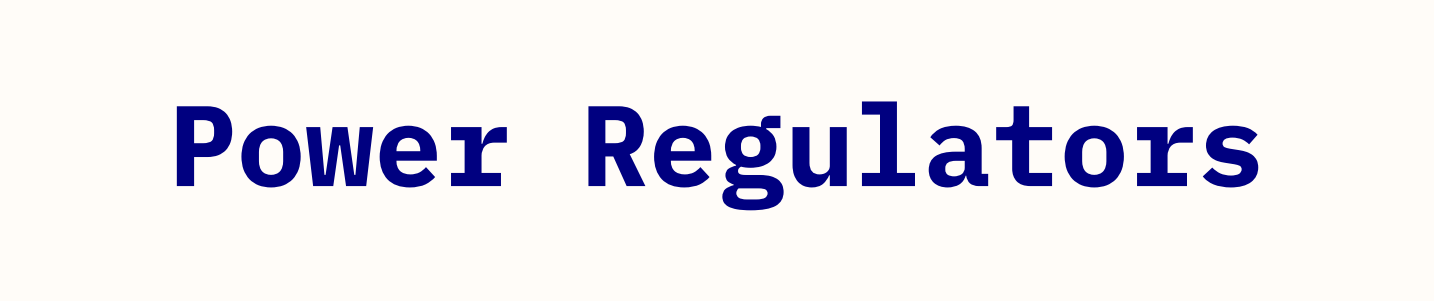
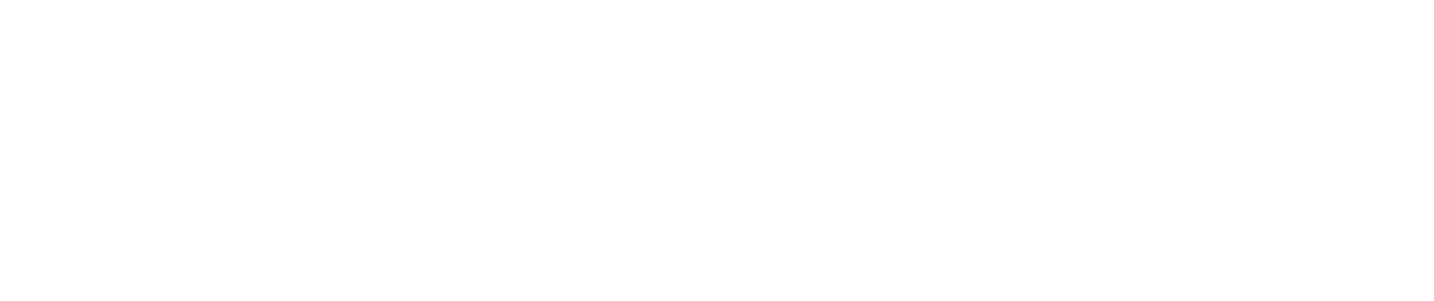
text: Power Regulators (717, 155) -> none

